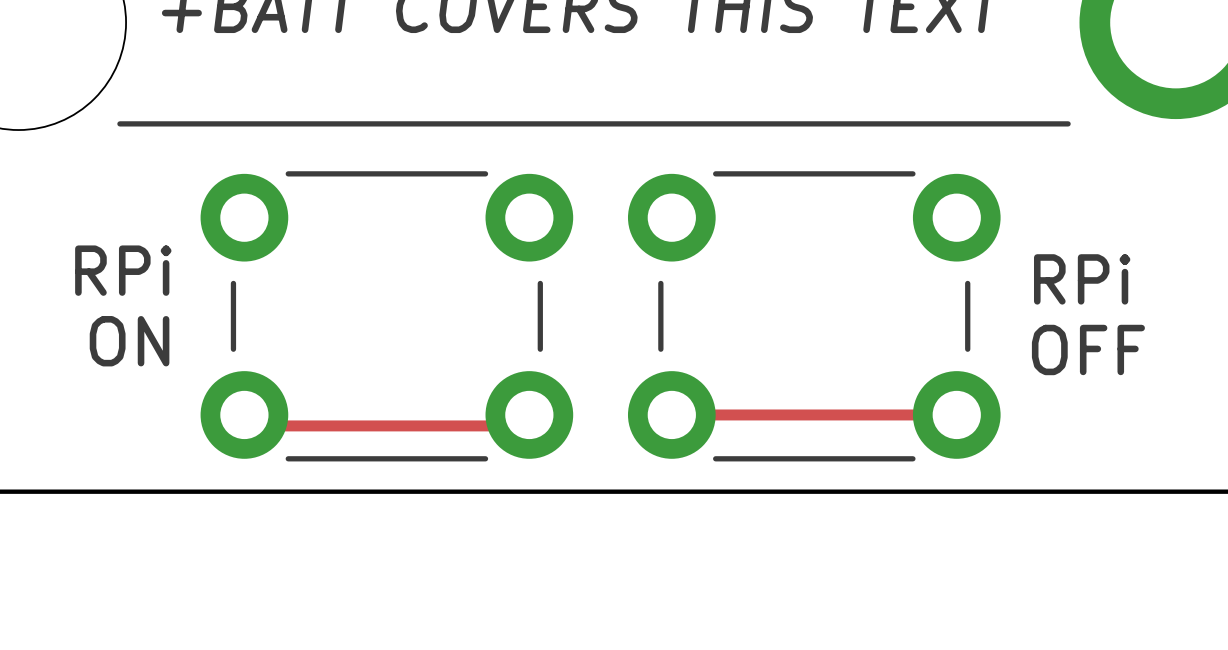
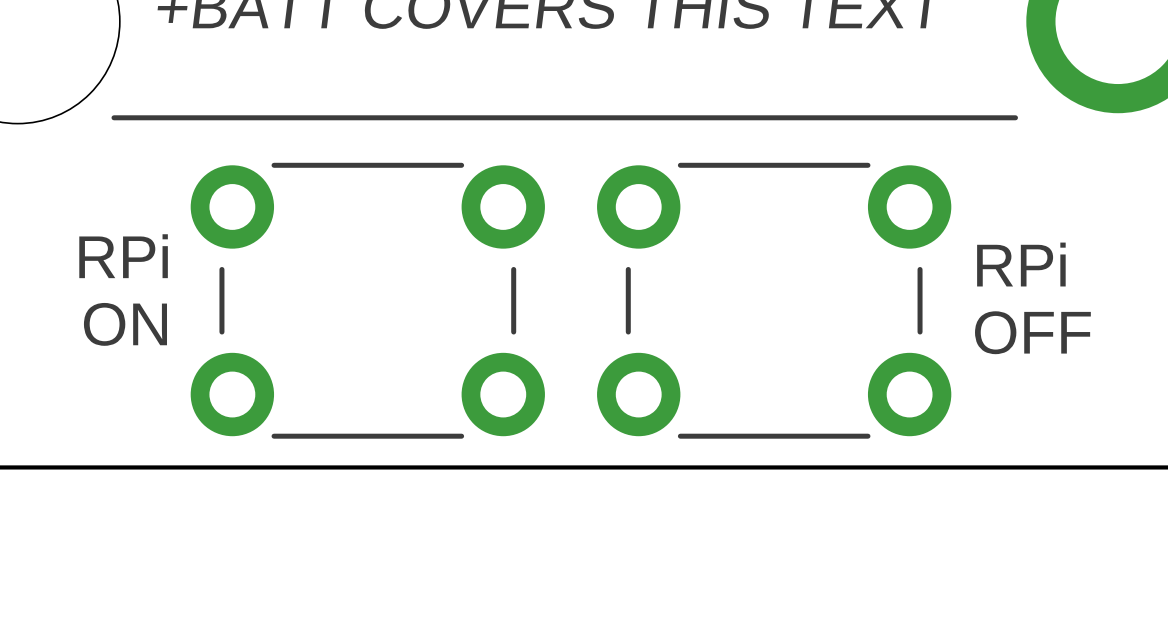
track: (244, 414) (255, 425) (518, 425) (529, 414) -> none
track: (671, 414) (956, 414) -> none

